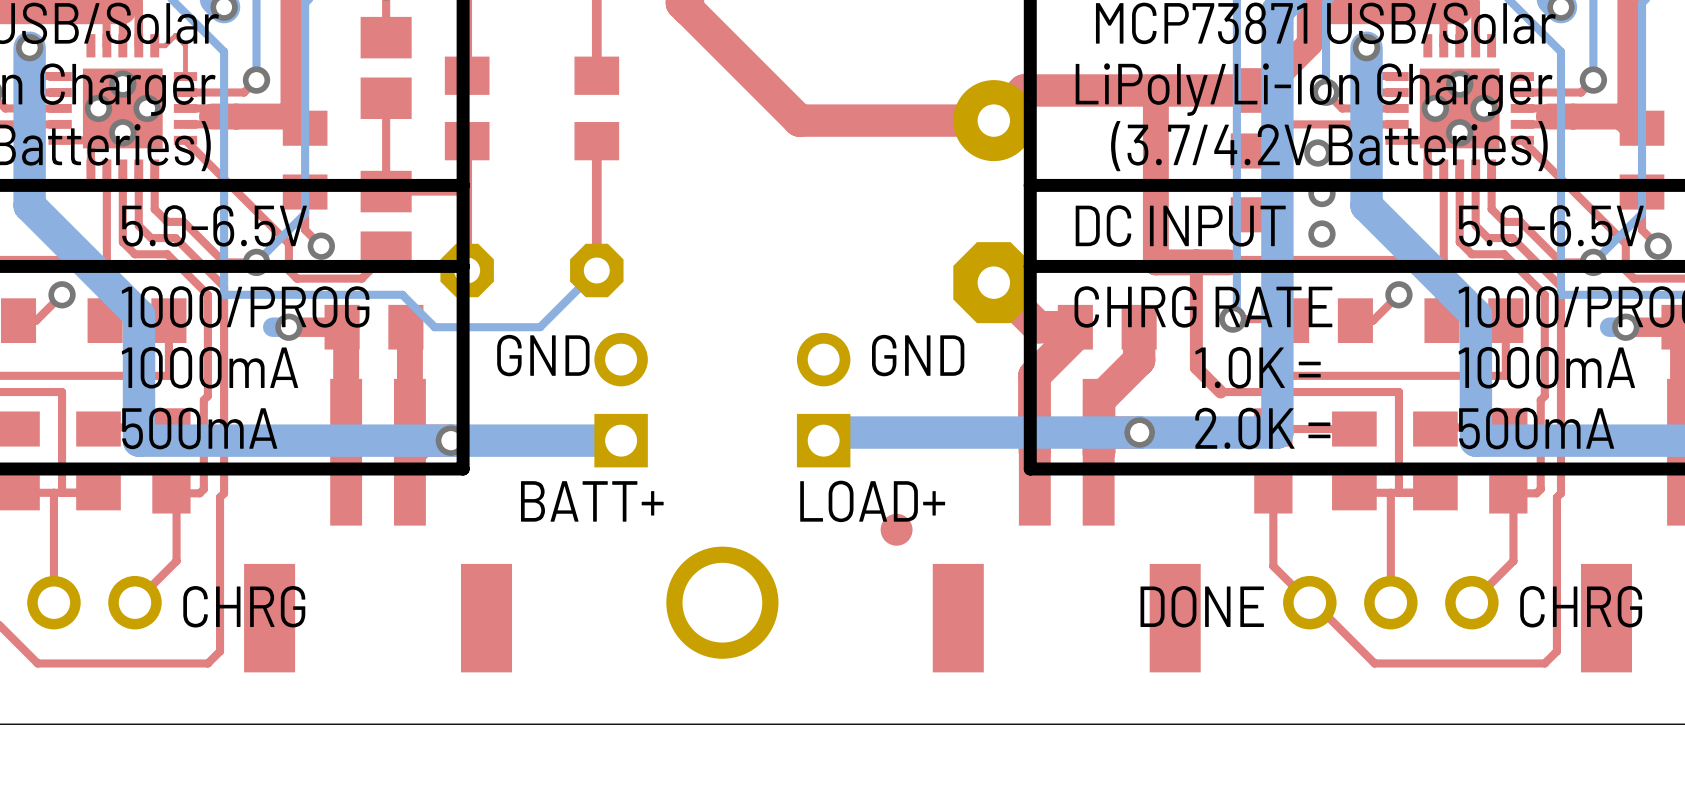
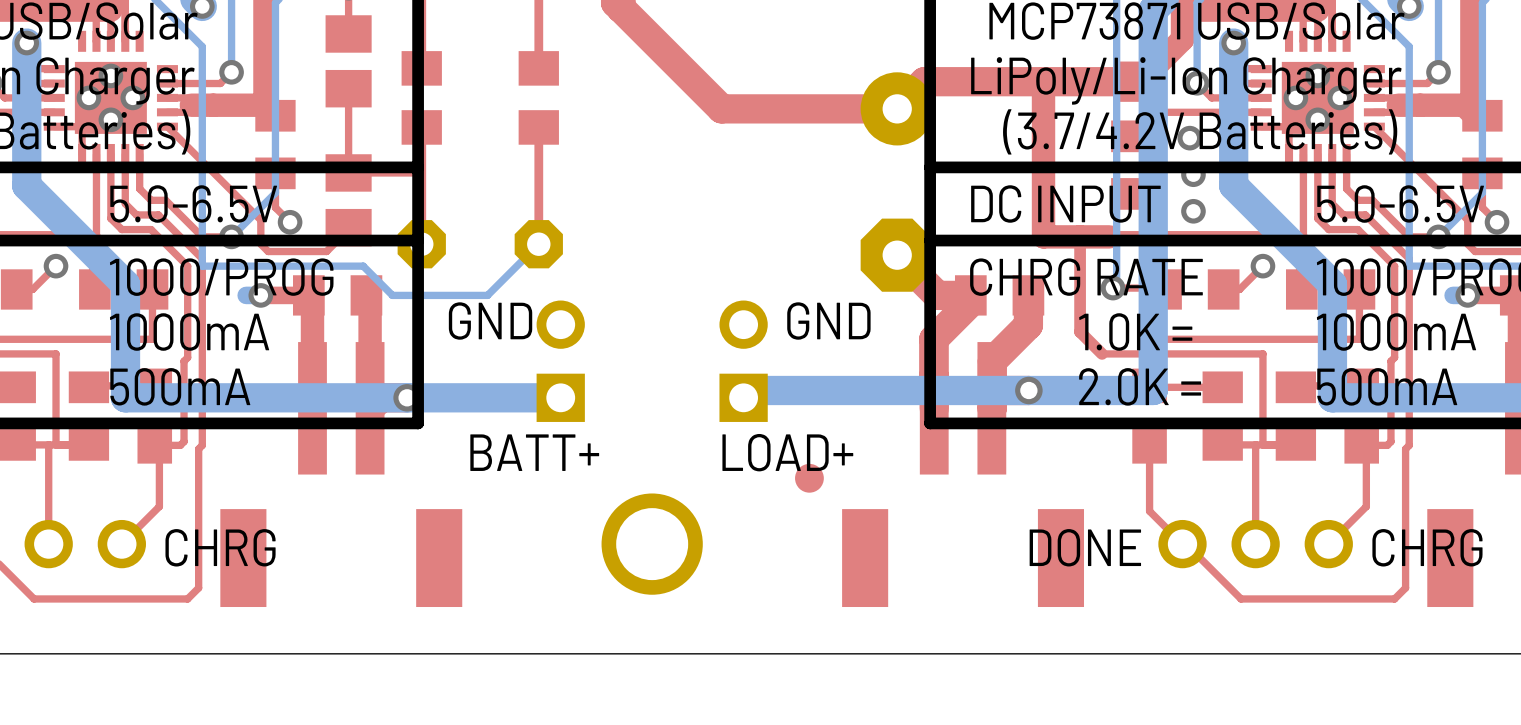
top track: (154, 45) (165, 45) (175, 35) (185, 45) (185, 76) -> none

